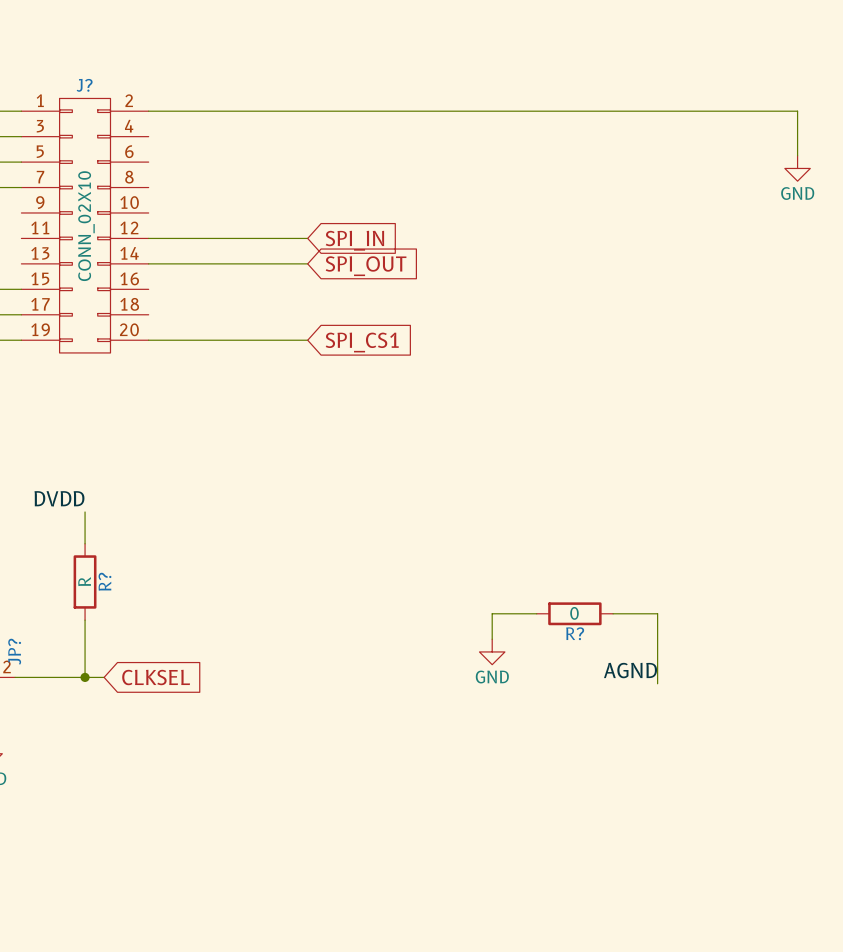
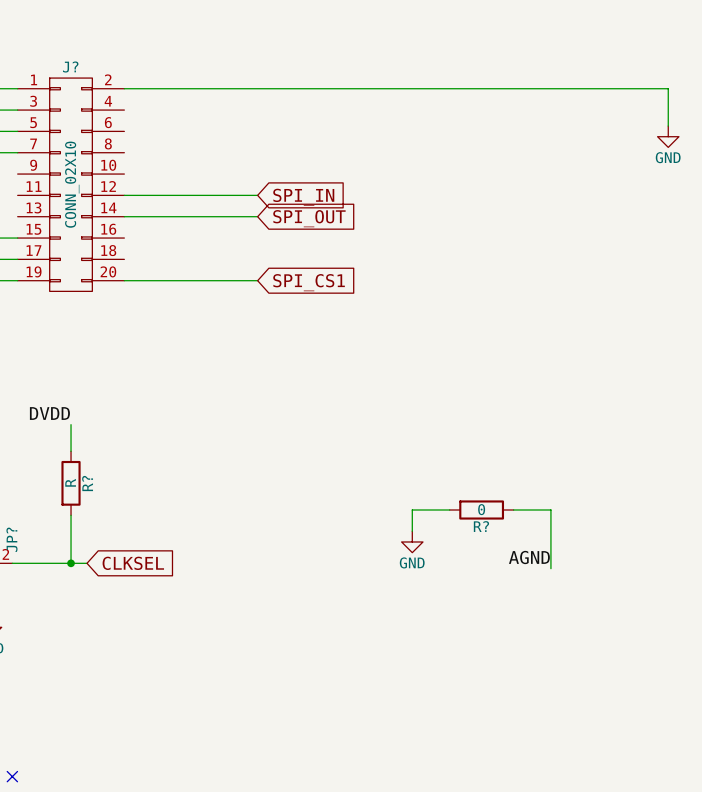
no-connect mark: none -> (12, 776)

